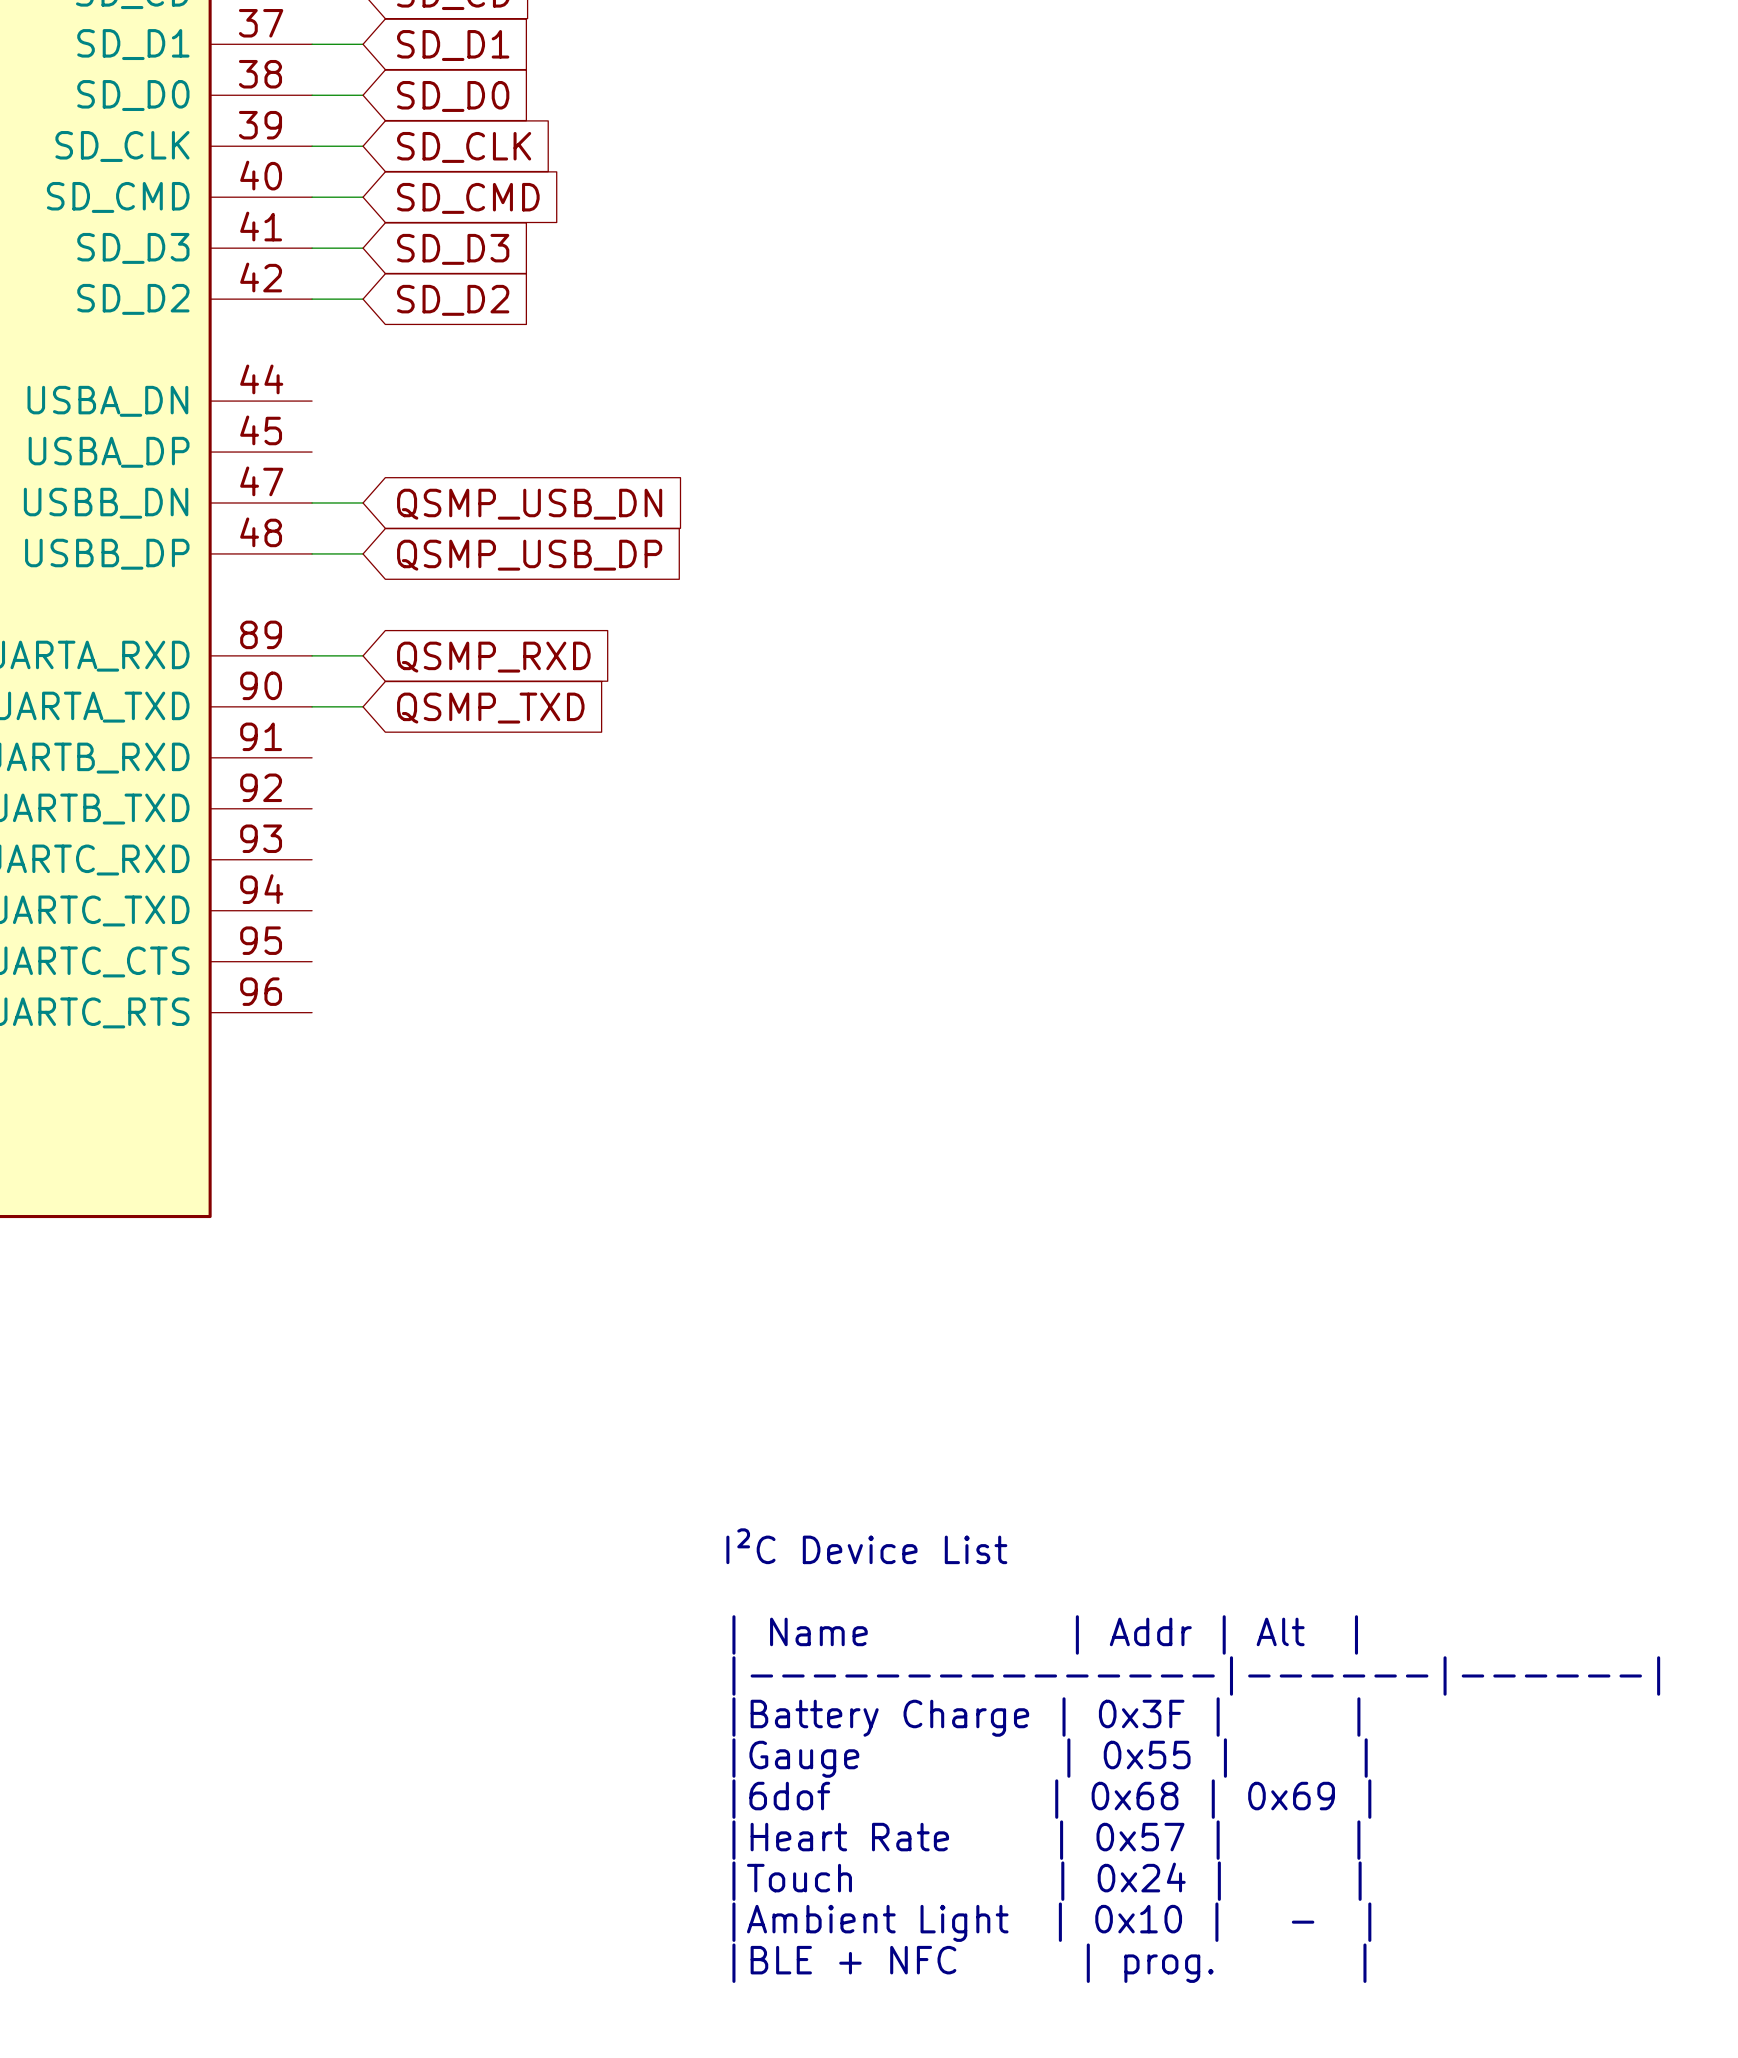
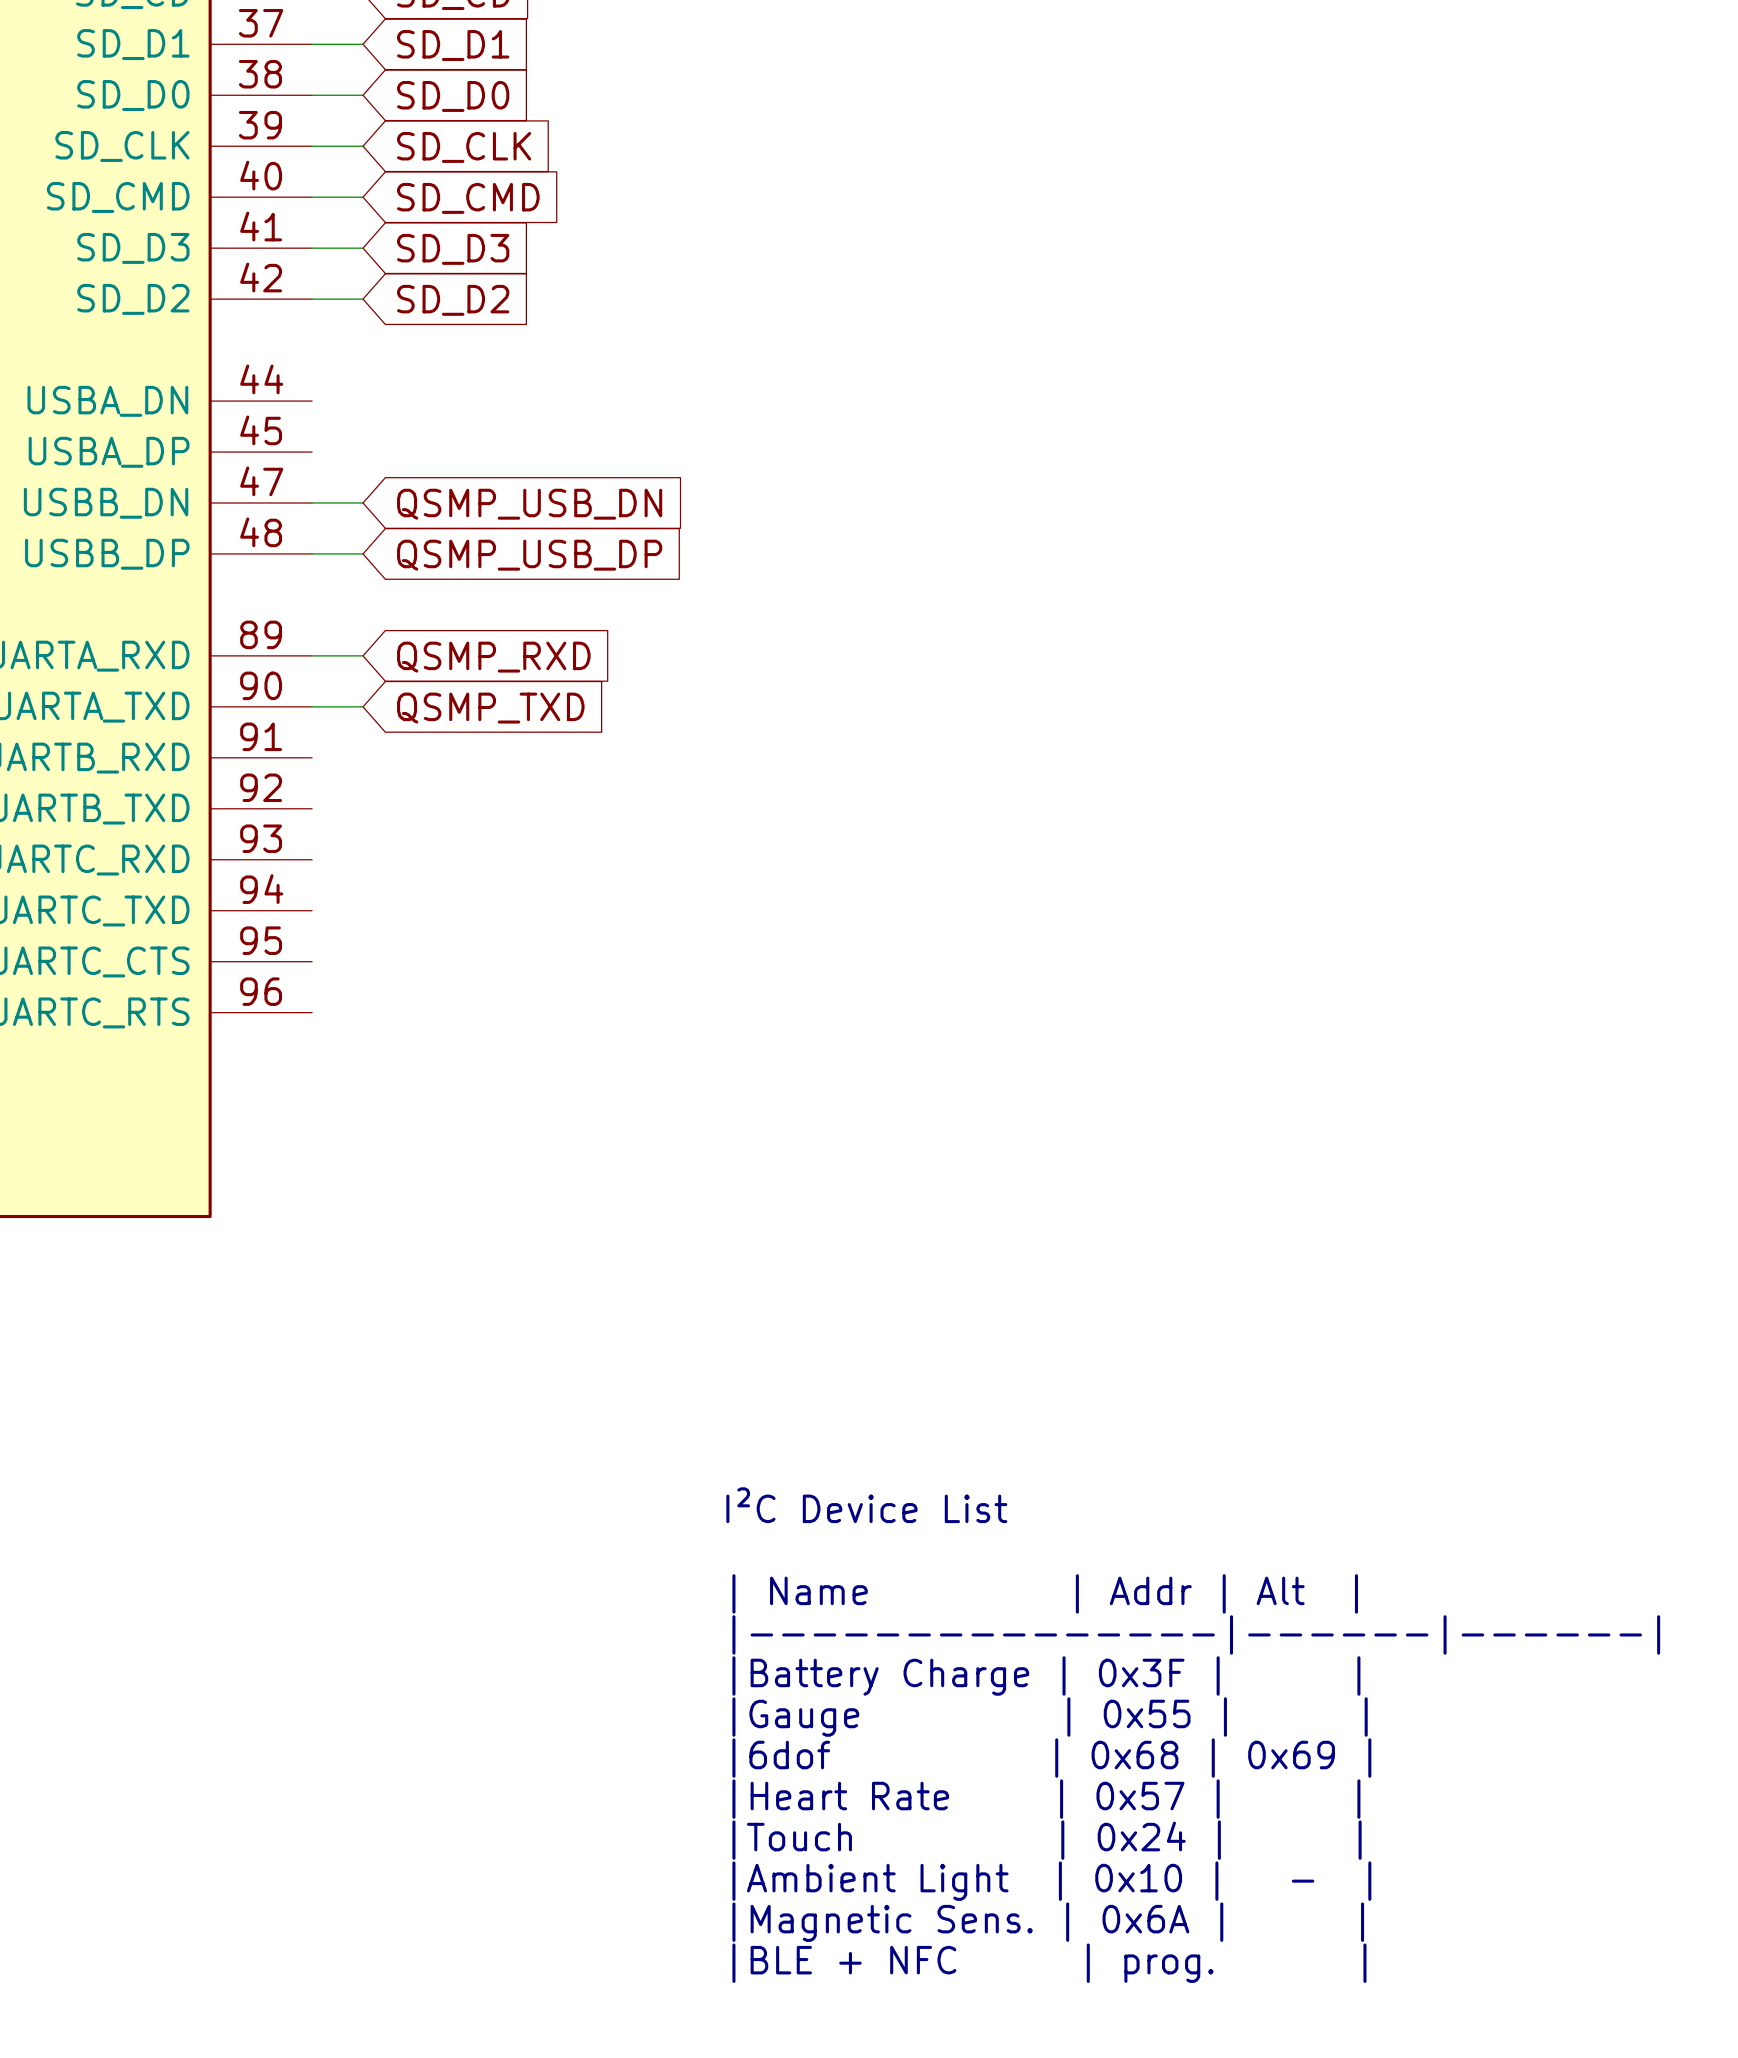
text position: I²C Device List (866, 1546) -> I²C Device List (866, 1505)
text: none -> | Name | Addr | Alt | (1045, 1593)
text: | Name | Addr | Alt | (1045, 1634) -> |---------------|------|------| (1196, 1634)
text: |---------------|------|------| (1196, 1675) -> |Battery Charge | 0x3F | | (1046, 1675)
text: |Battery Charge | 0x3F | | (1046, 1717) -> |Gauge | 0x55 | | (1050, 1717)
text: |Gauge | 0x55 | | (1050, 1758) -> |6dof | 0x68 | 0x69 | (1051, 1758)
text: |6dof | 0x68 | 0x69 | (1051, 1799) -> |Heart Rate | 0x57 | | (1046, 1799)
text: |Heart Rate | 0x57 | | (1046, 1840) -> |Touch | 0x24 | | (1047, 1840)
text: |Touch | 0x24 | | (1047, 1881) -> |Ambient Light | 0x10 | - | (1051, 1881)
text: |Ambient Light | 0x10 | - | (1051, 1922) -> |Magnetic Sens. | 0x6A | | (1048, 1922)

